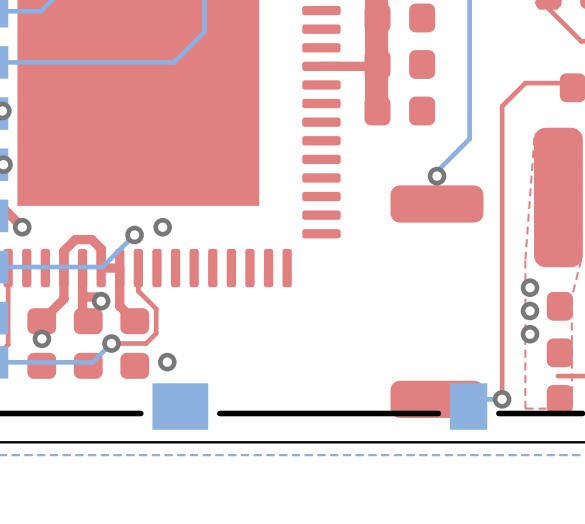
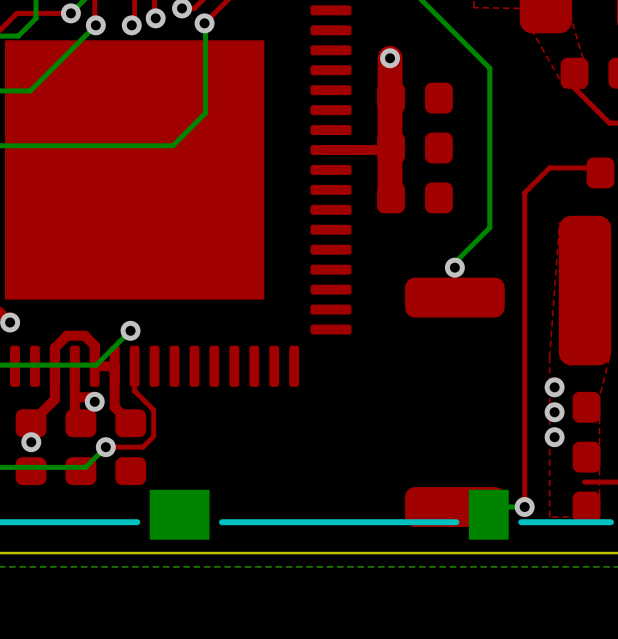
via: (162, 227) -> none
via: (167, 362) -> none

